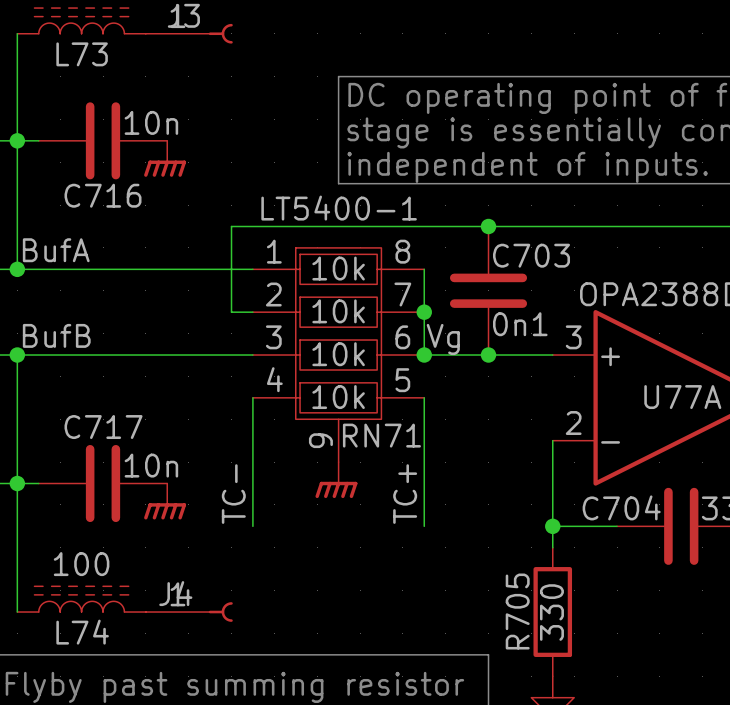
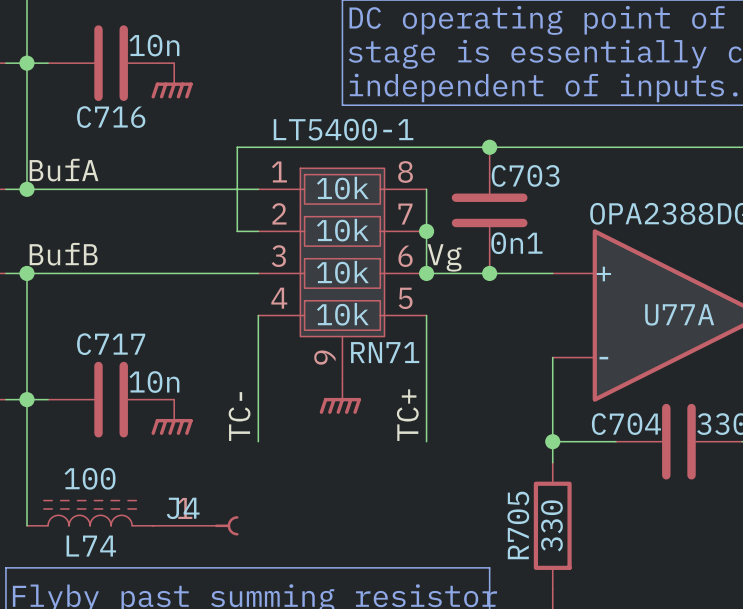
U77A pin number: 3 (573, 337) -> none
U77A pin number: 2 (573, 423) -> none

